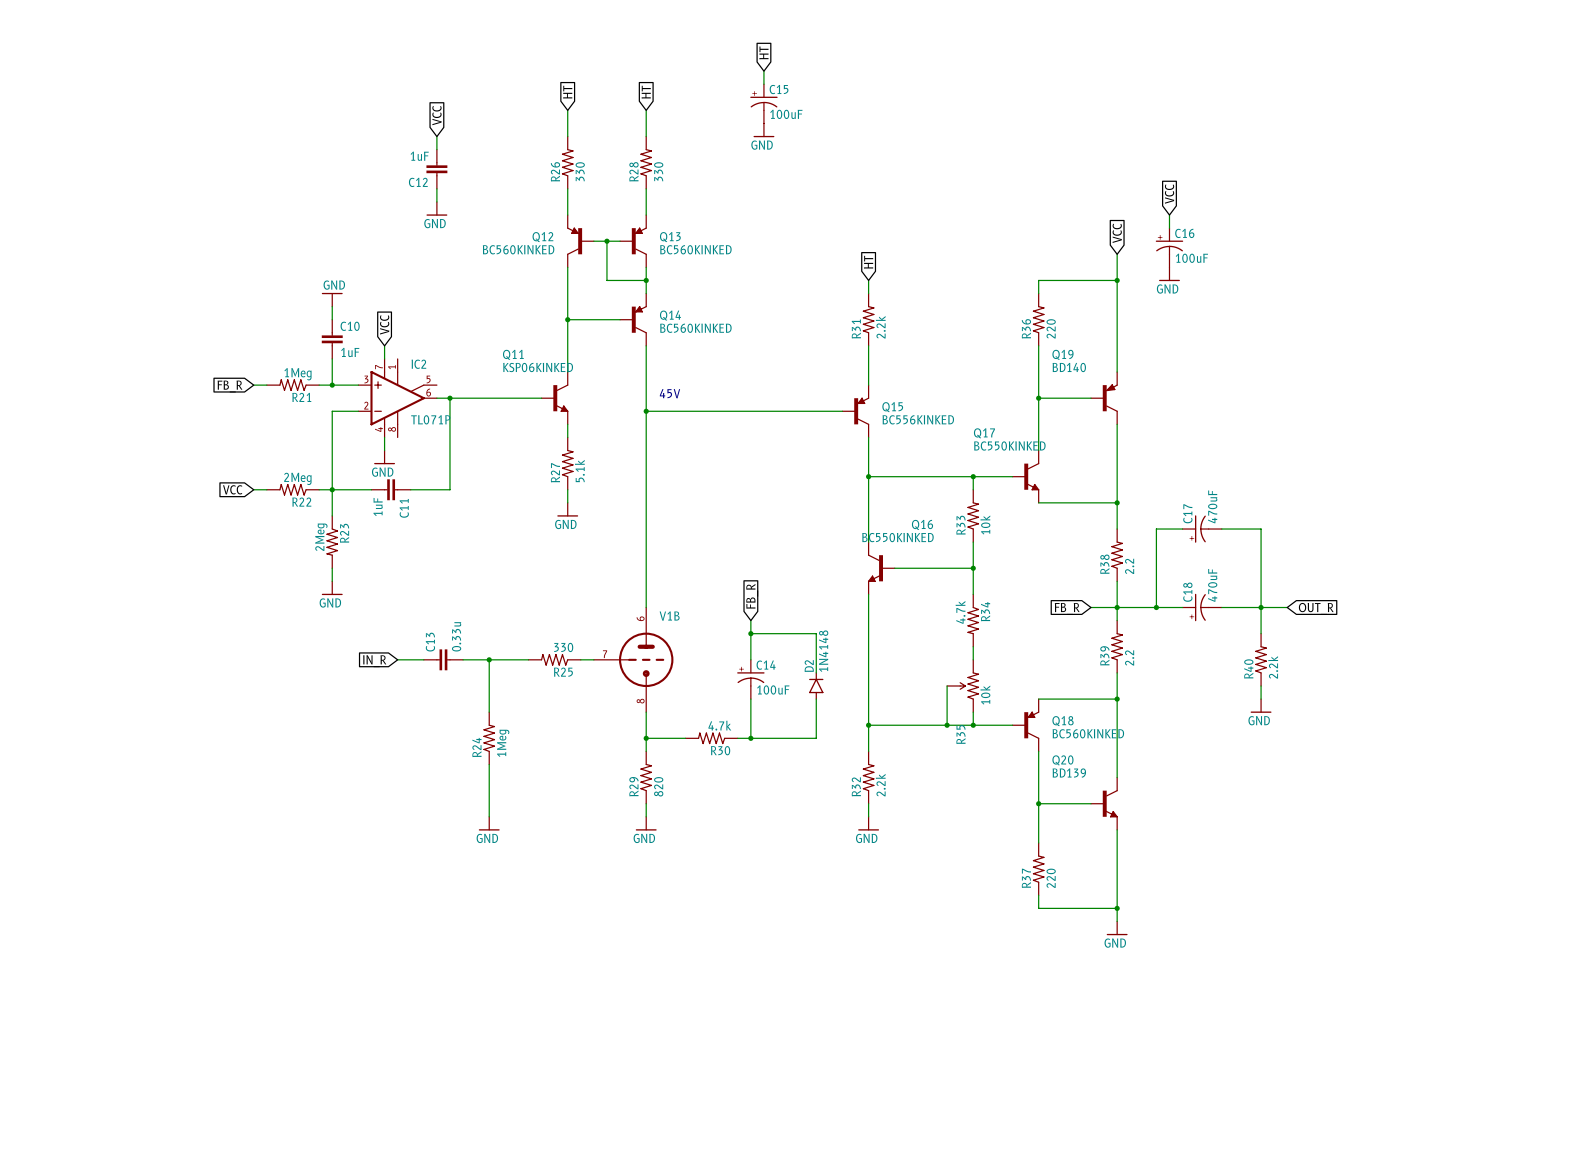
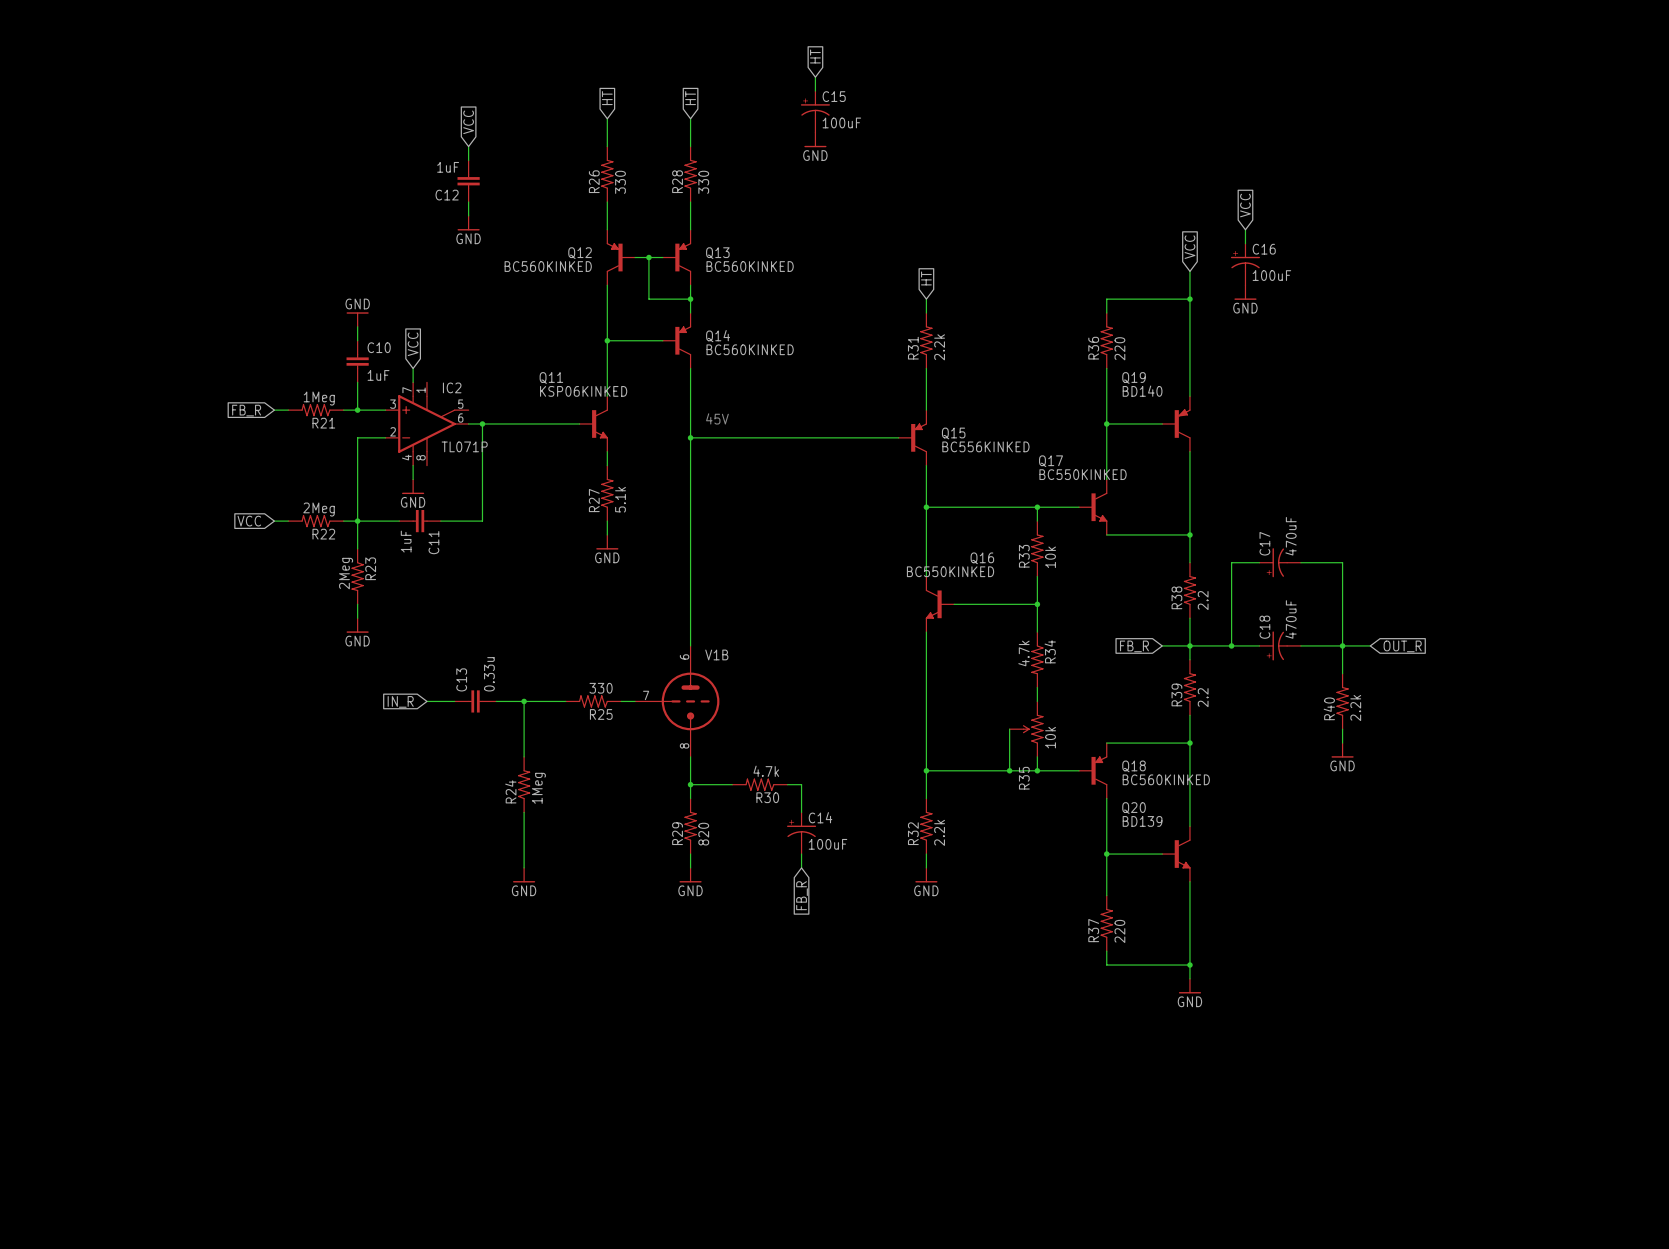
global label: FB_R (752, 596) -> none
wire: (750, 620) (750, 659) -> none
wire: (750, 633) (816, 633) (816, 672) -> none
junction: (750, 633) -> none
C14 position: (750, 679) -> (801, 833)
D2: 1N4148 (816, 685) -> none
wire: (750, 699) (750, 738) (816, 738) (816, 699) -> none
wire: none -> (801, 784) (801, 812)
junction: (750, 738) -> none
wire: none -> (801, 854) (801, 867)
global label: none -> FB_R (802, 895)

